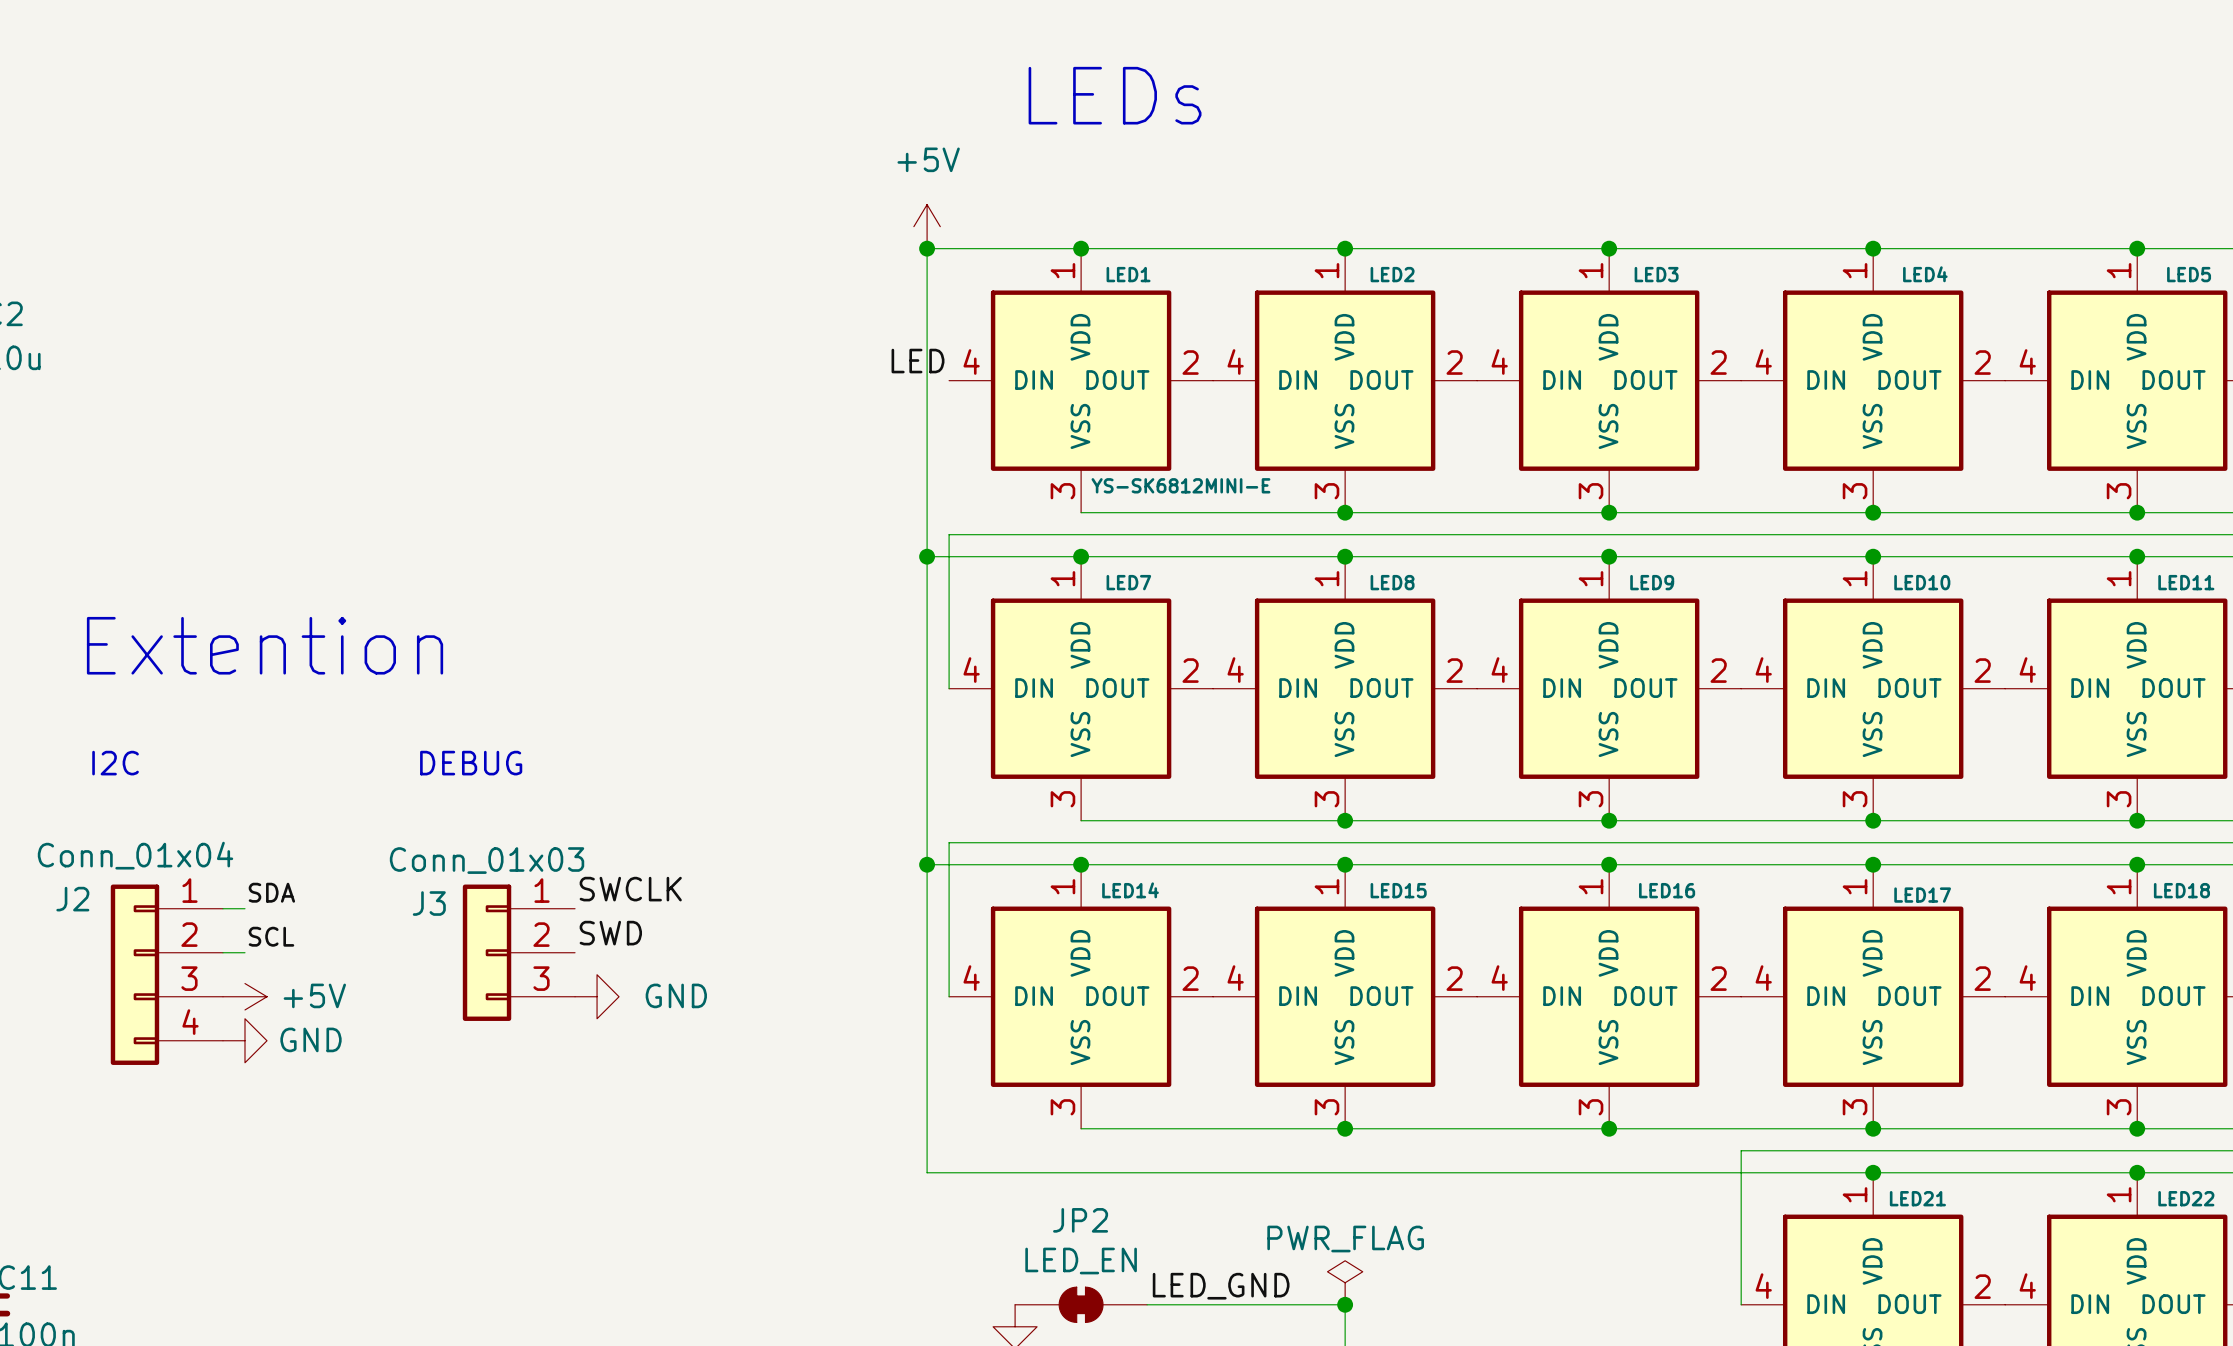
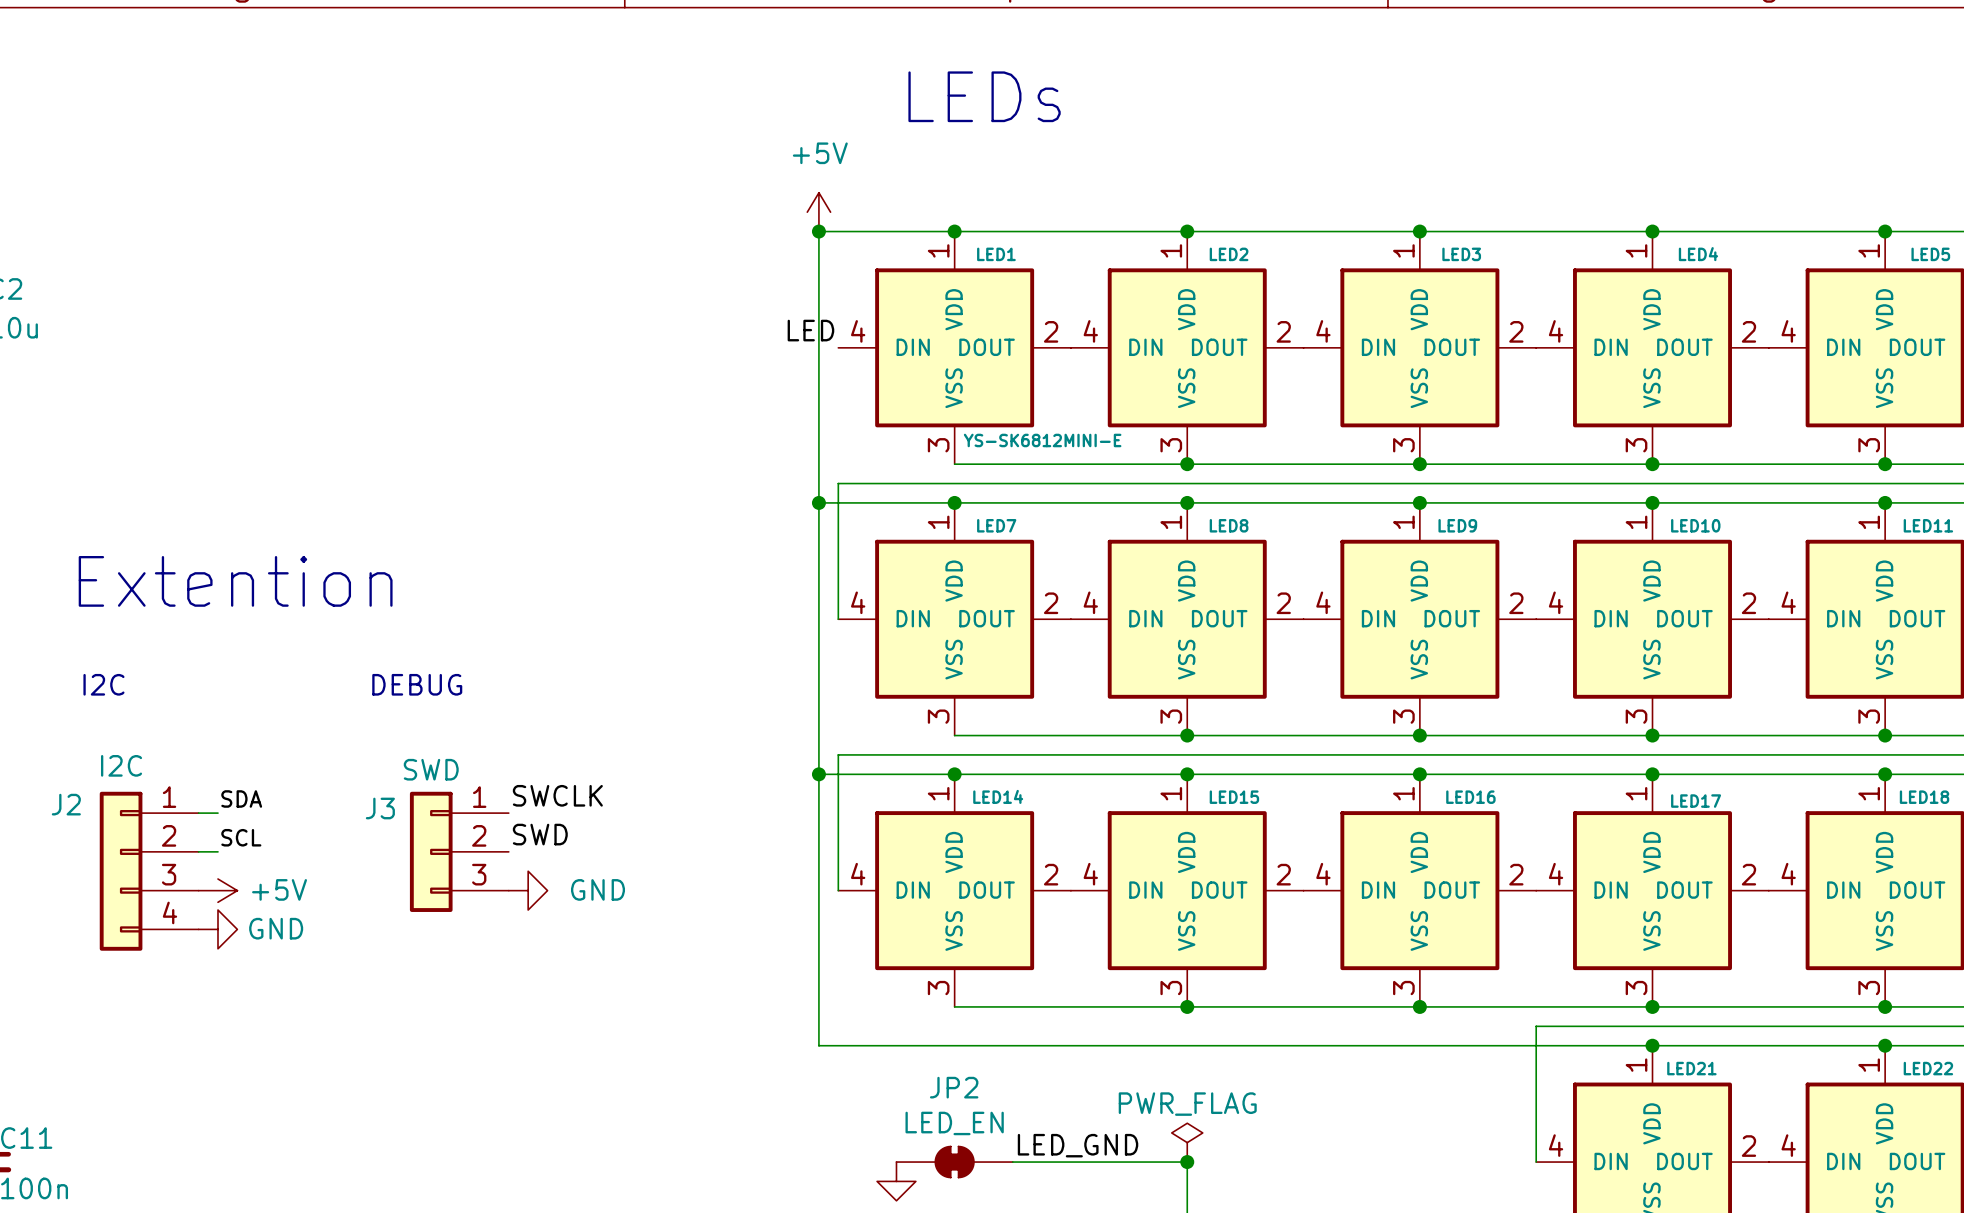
J2 value: Conn_01x04 (135, 855) -> I2C (121, 765)
J3 value: Conn_01x03 (487, 860) -> SWD (431, 769)

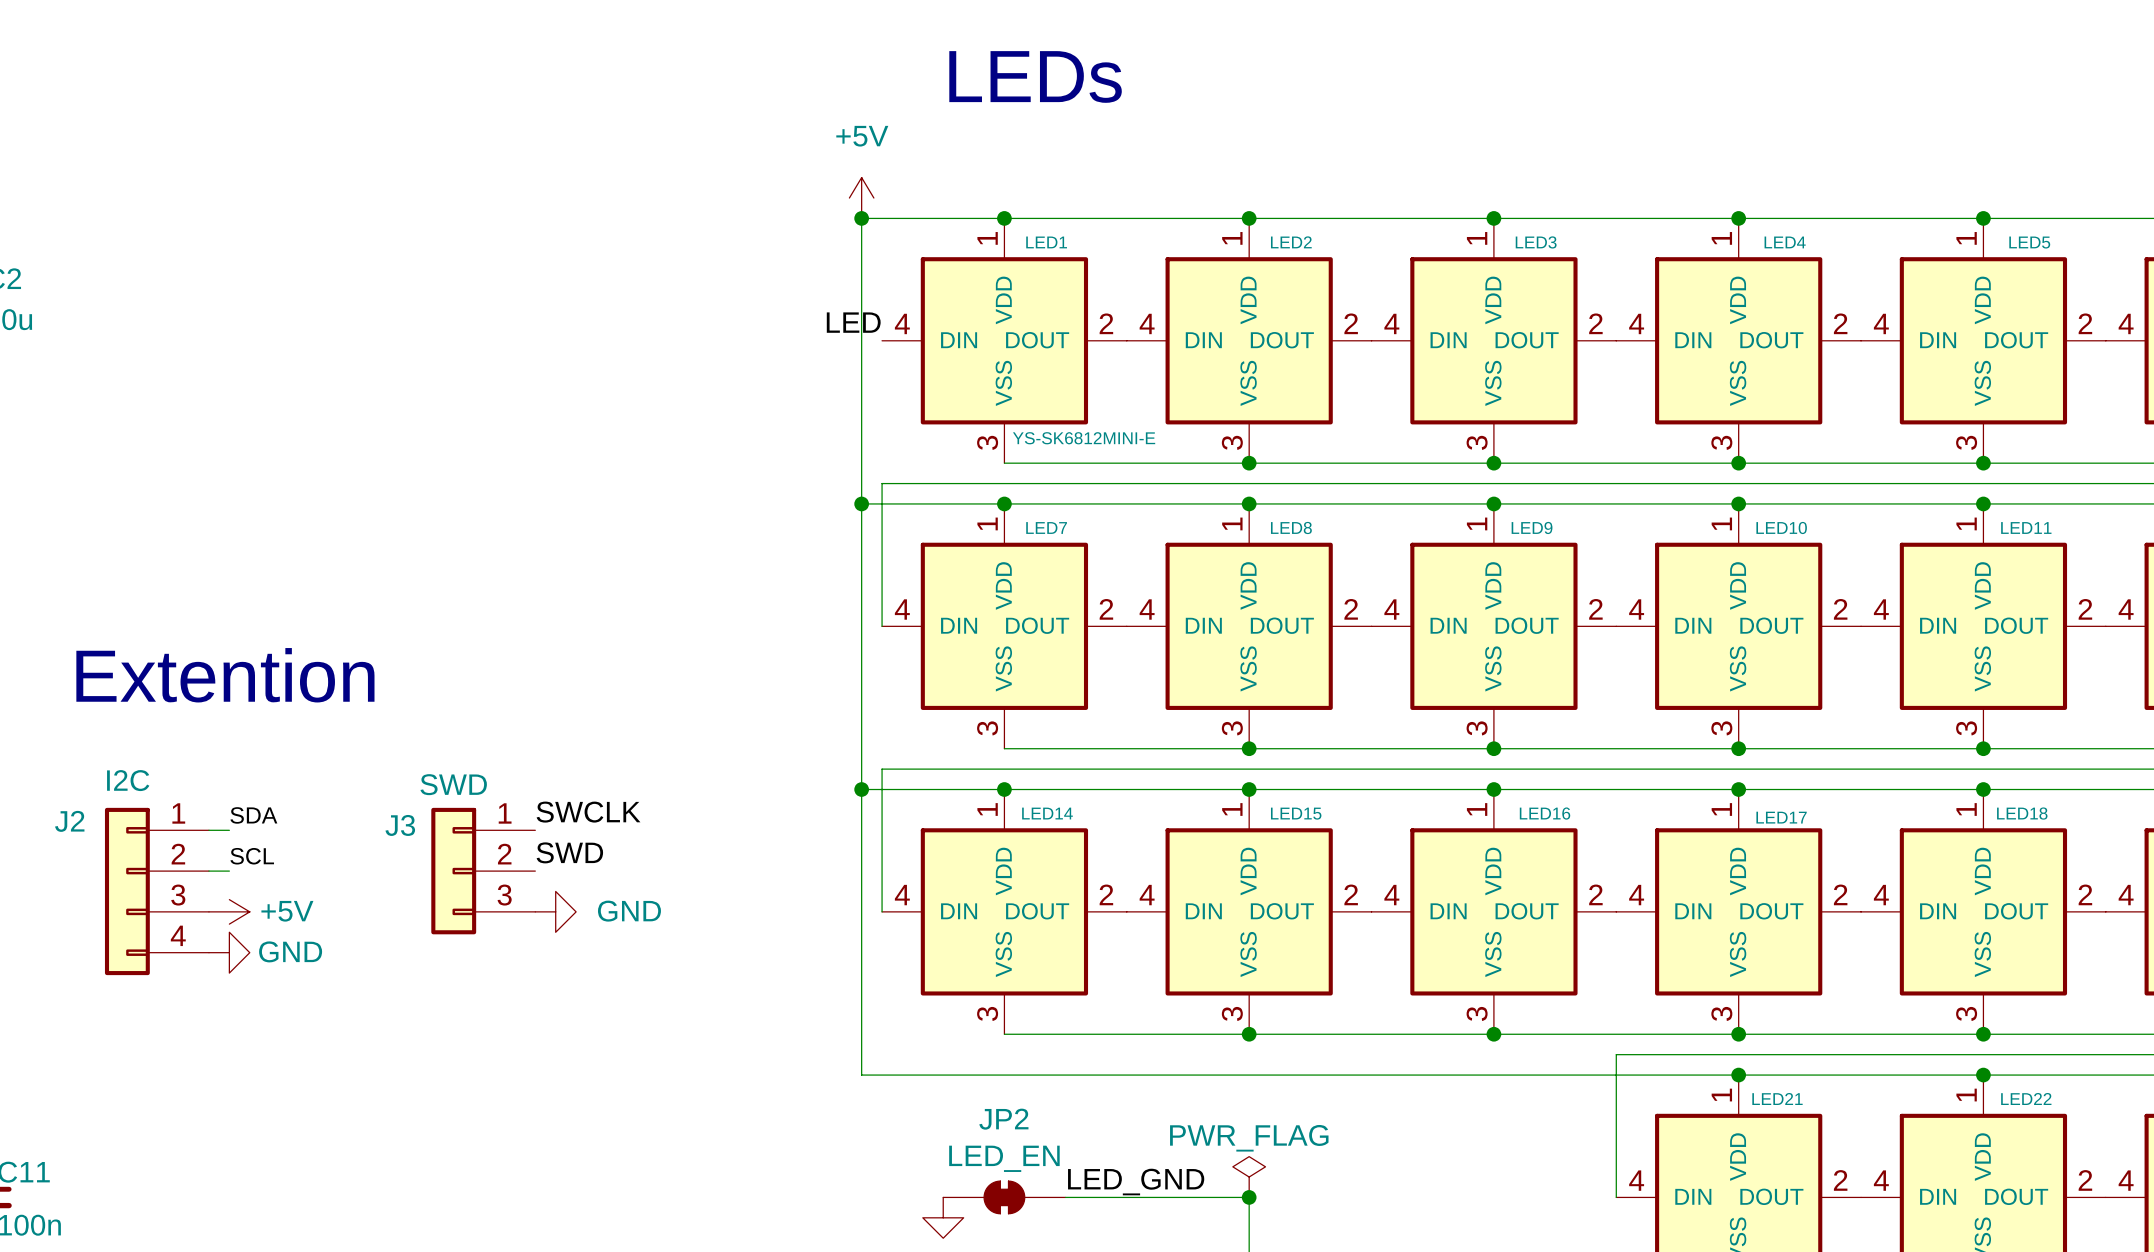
text: Extention (235, 581) -> none
text: I2C (103, 684) -> Extention (225, 675)
text: DEBUG (417, 684) -> none

